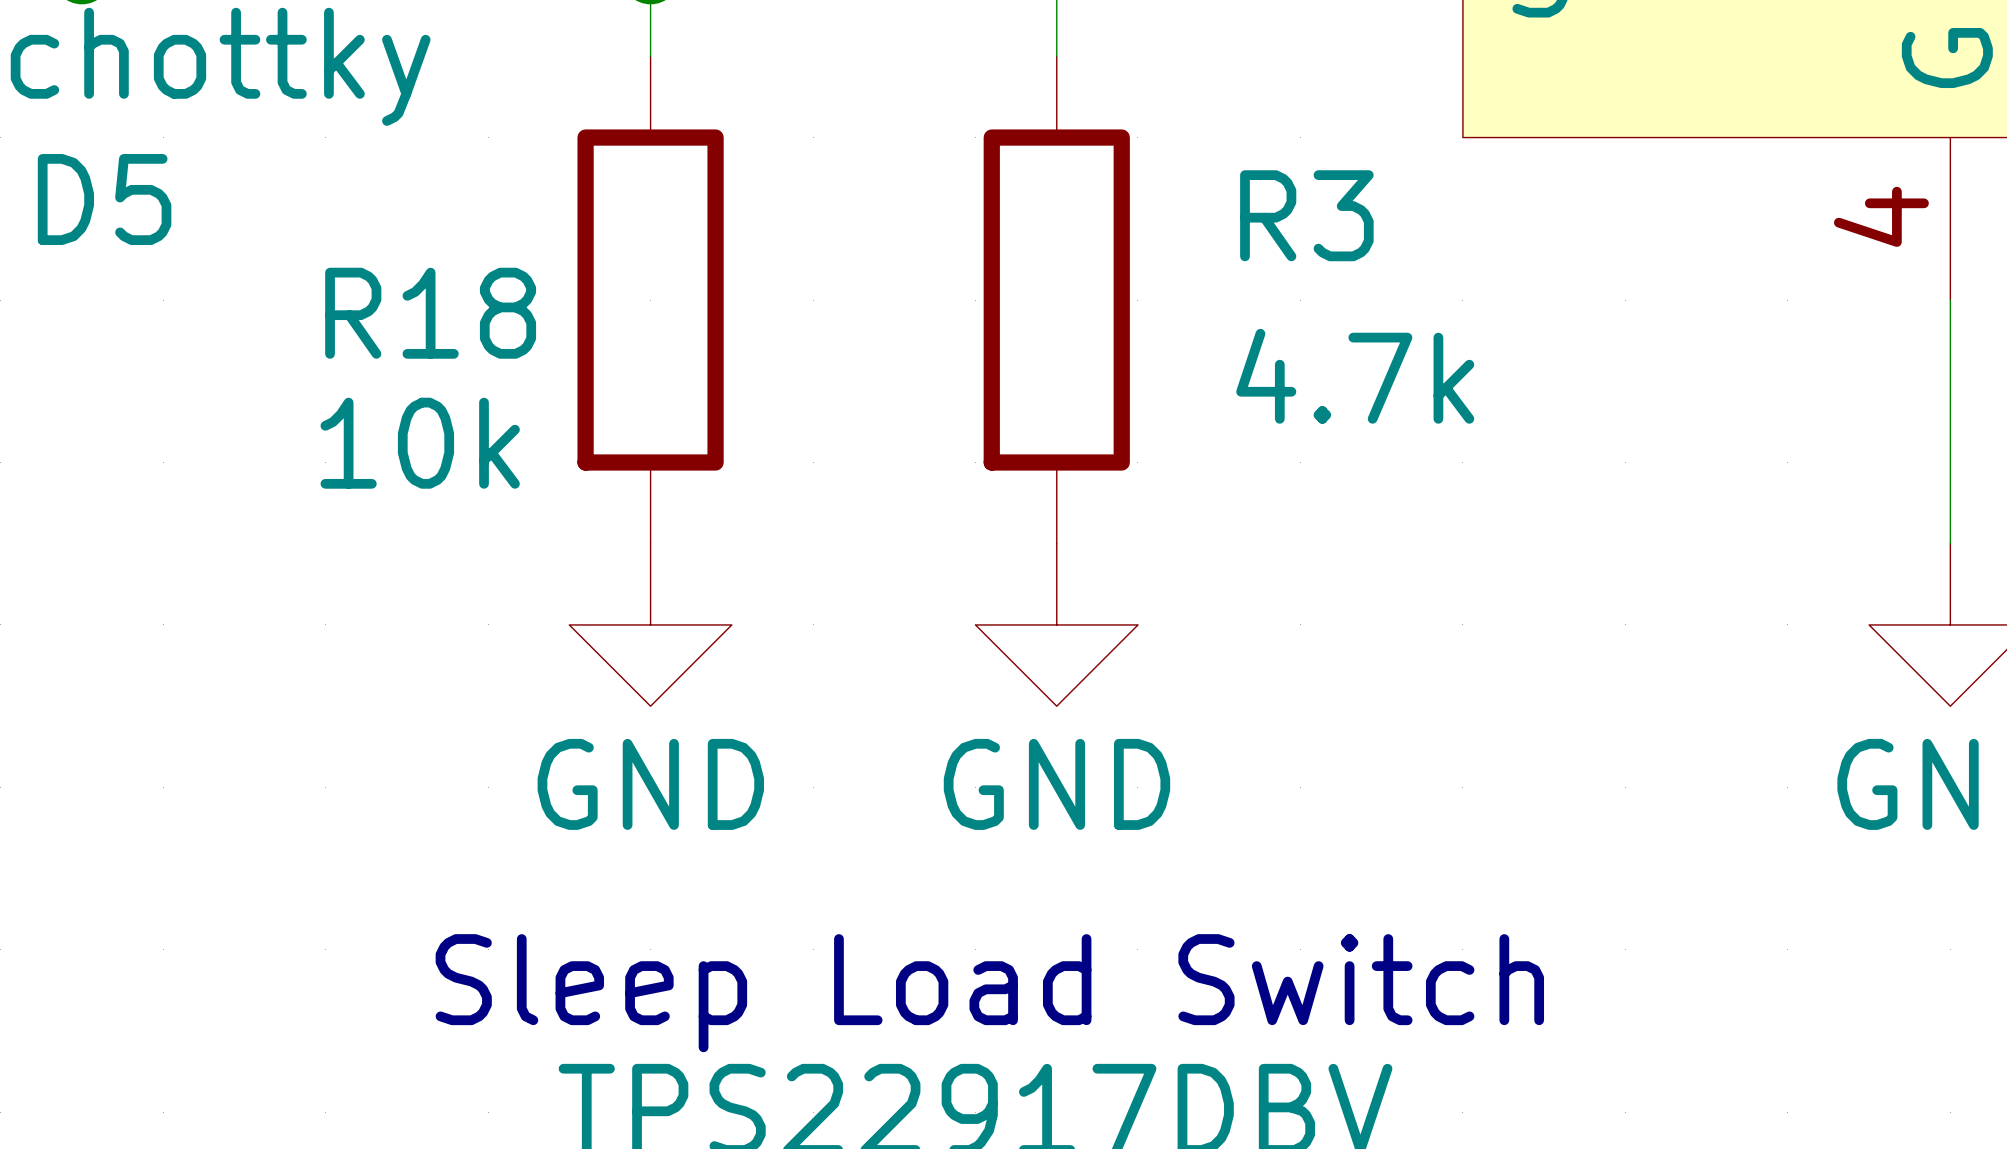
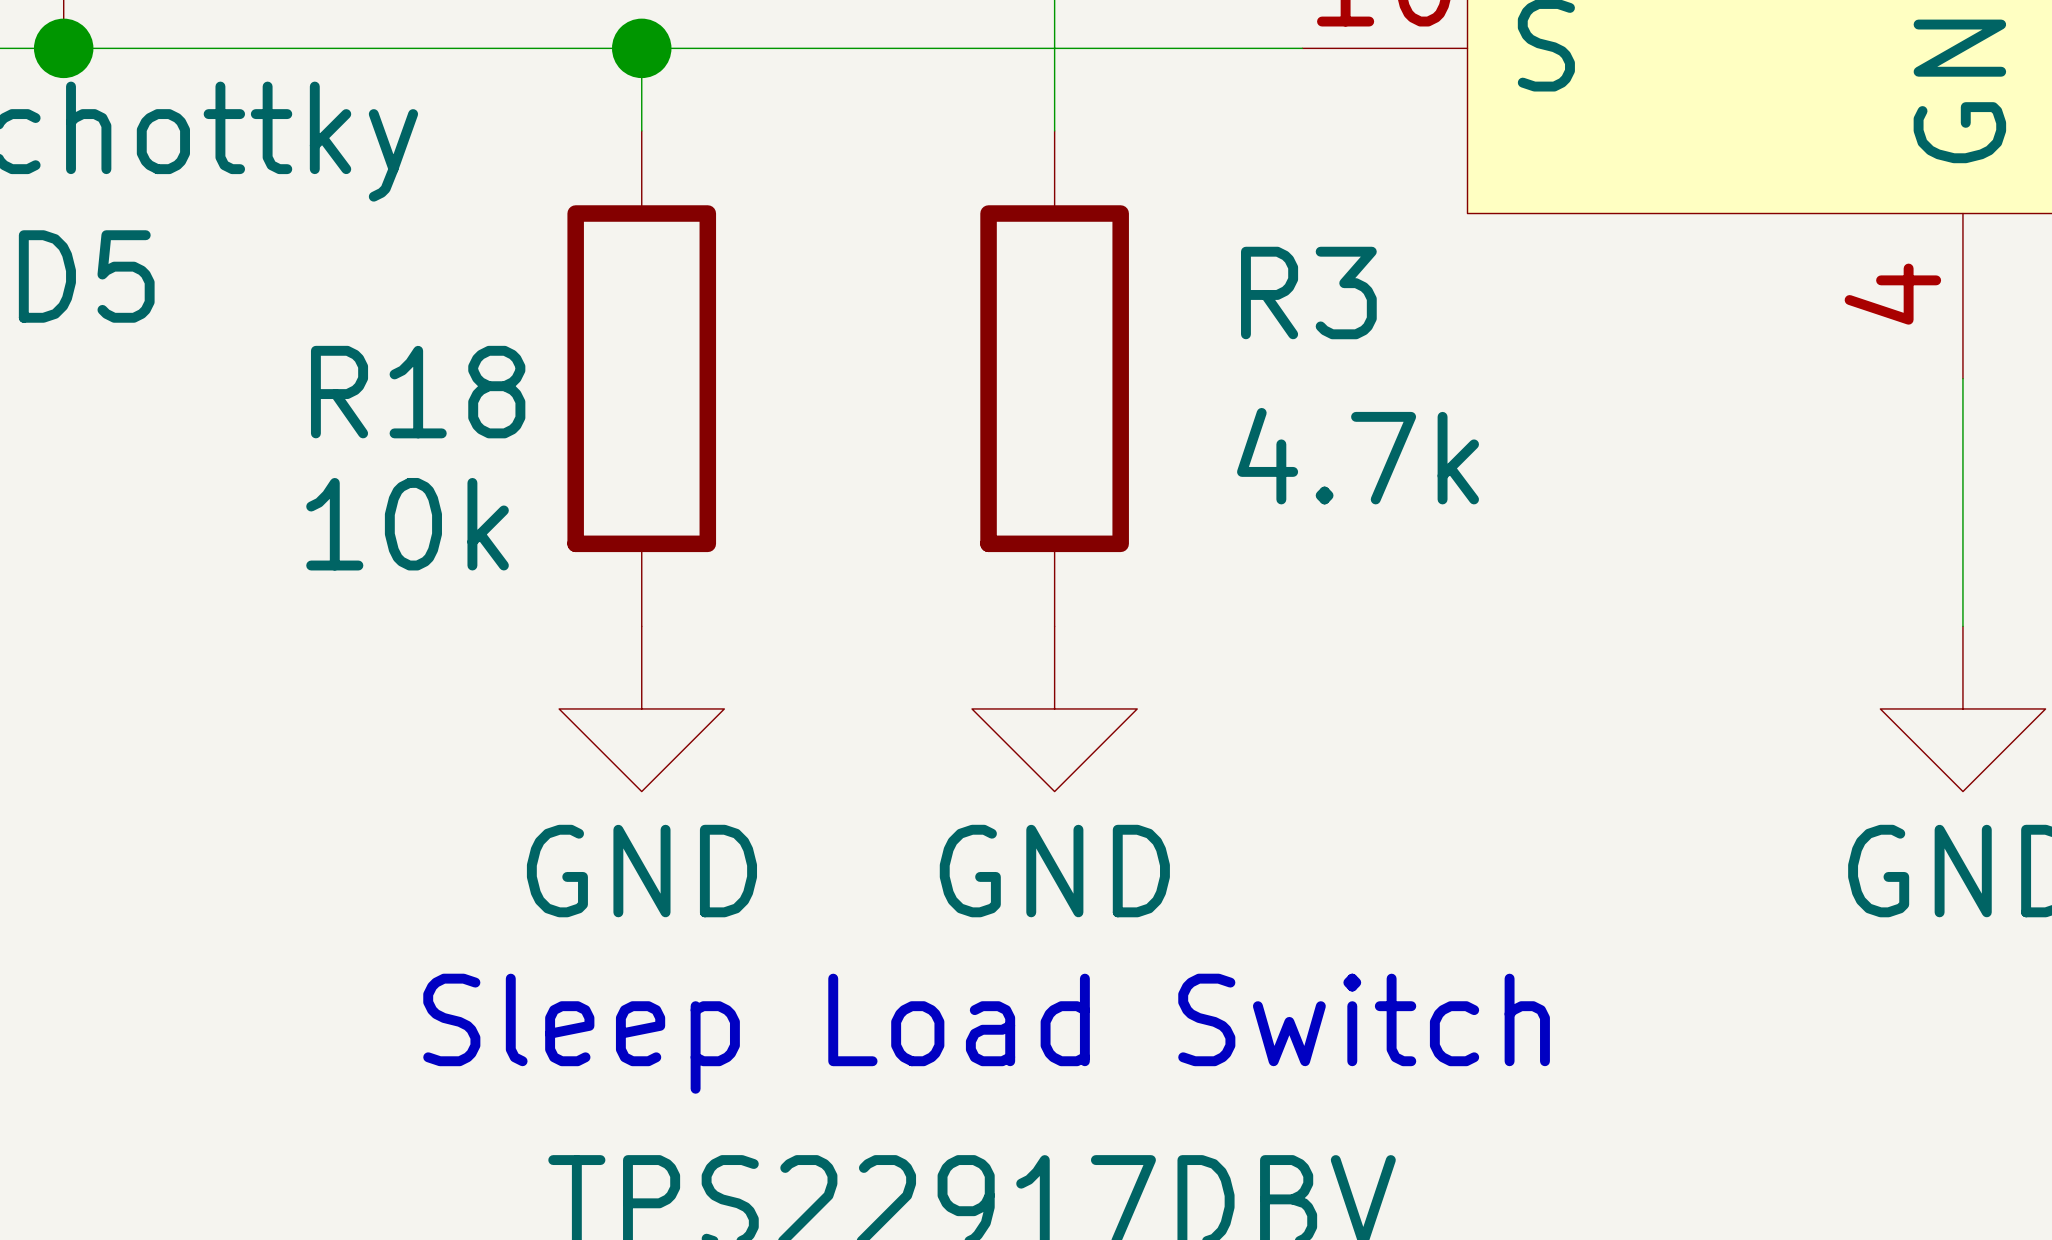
text position: Sleep Load Switch (989, 993) -> Sleep Load Switch (986, 1033)

